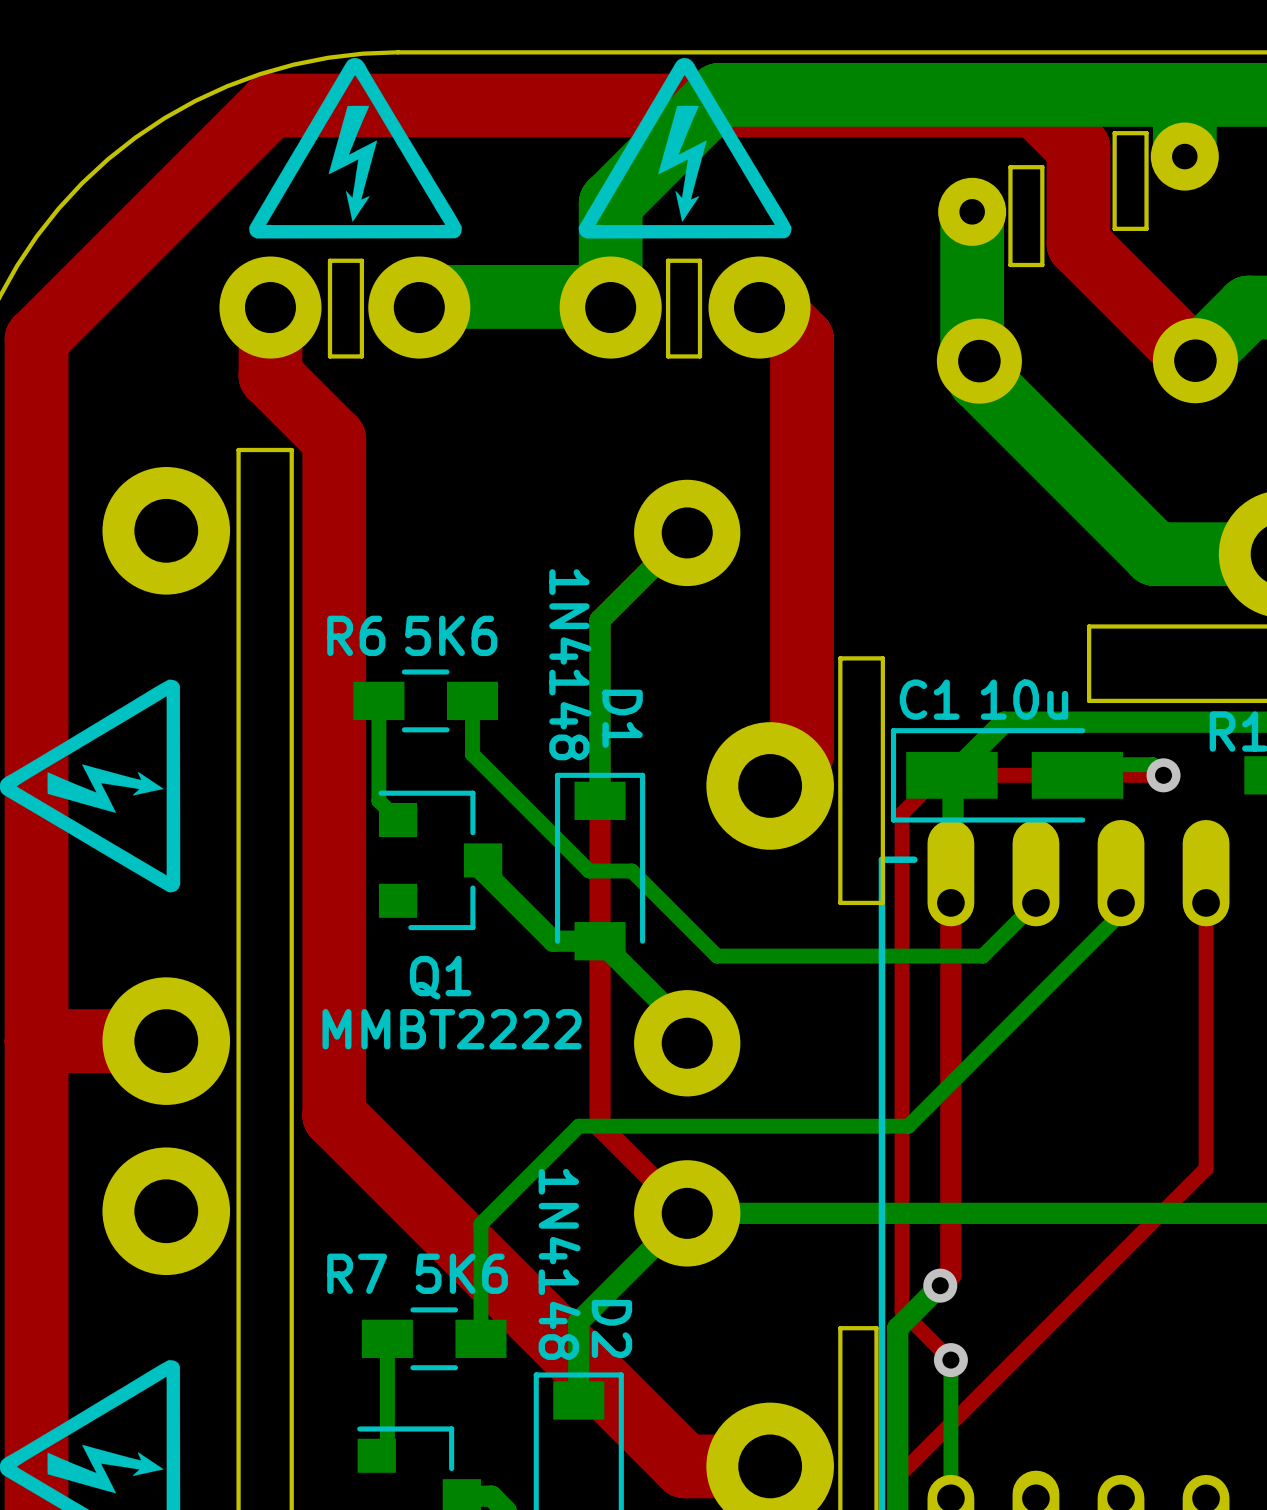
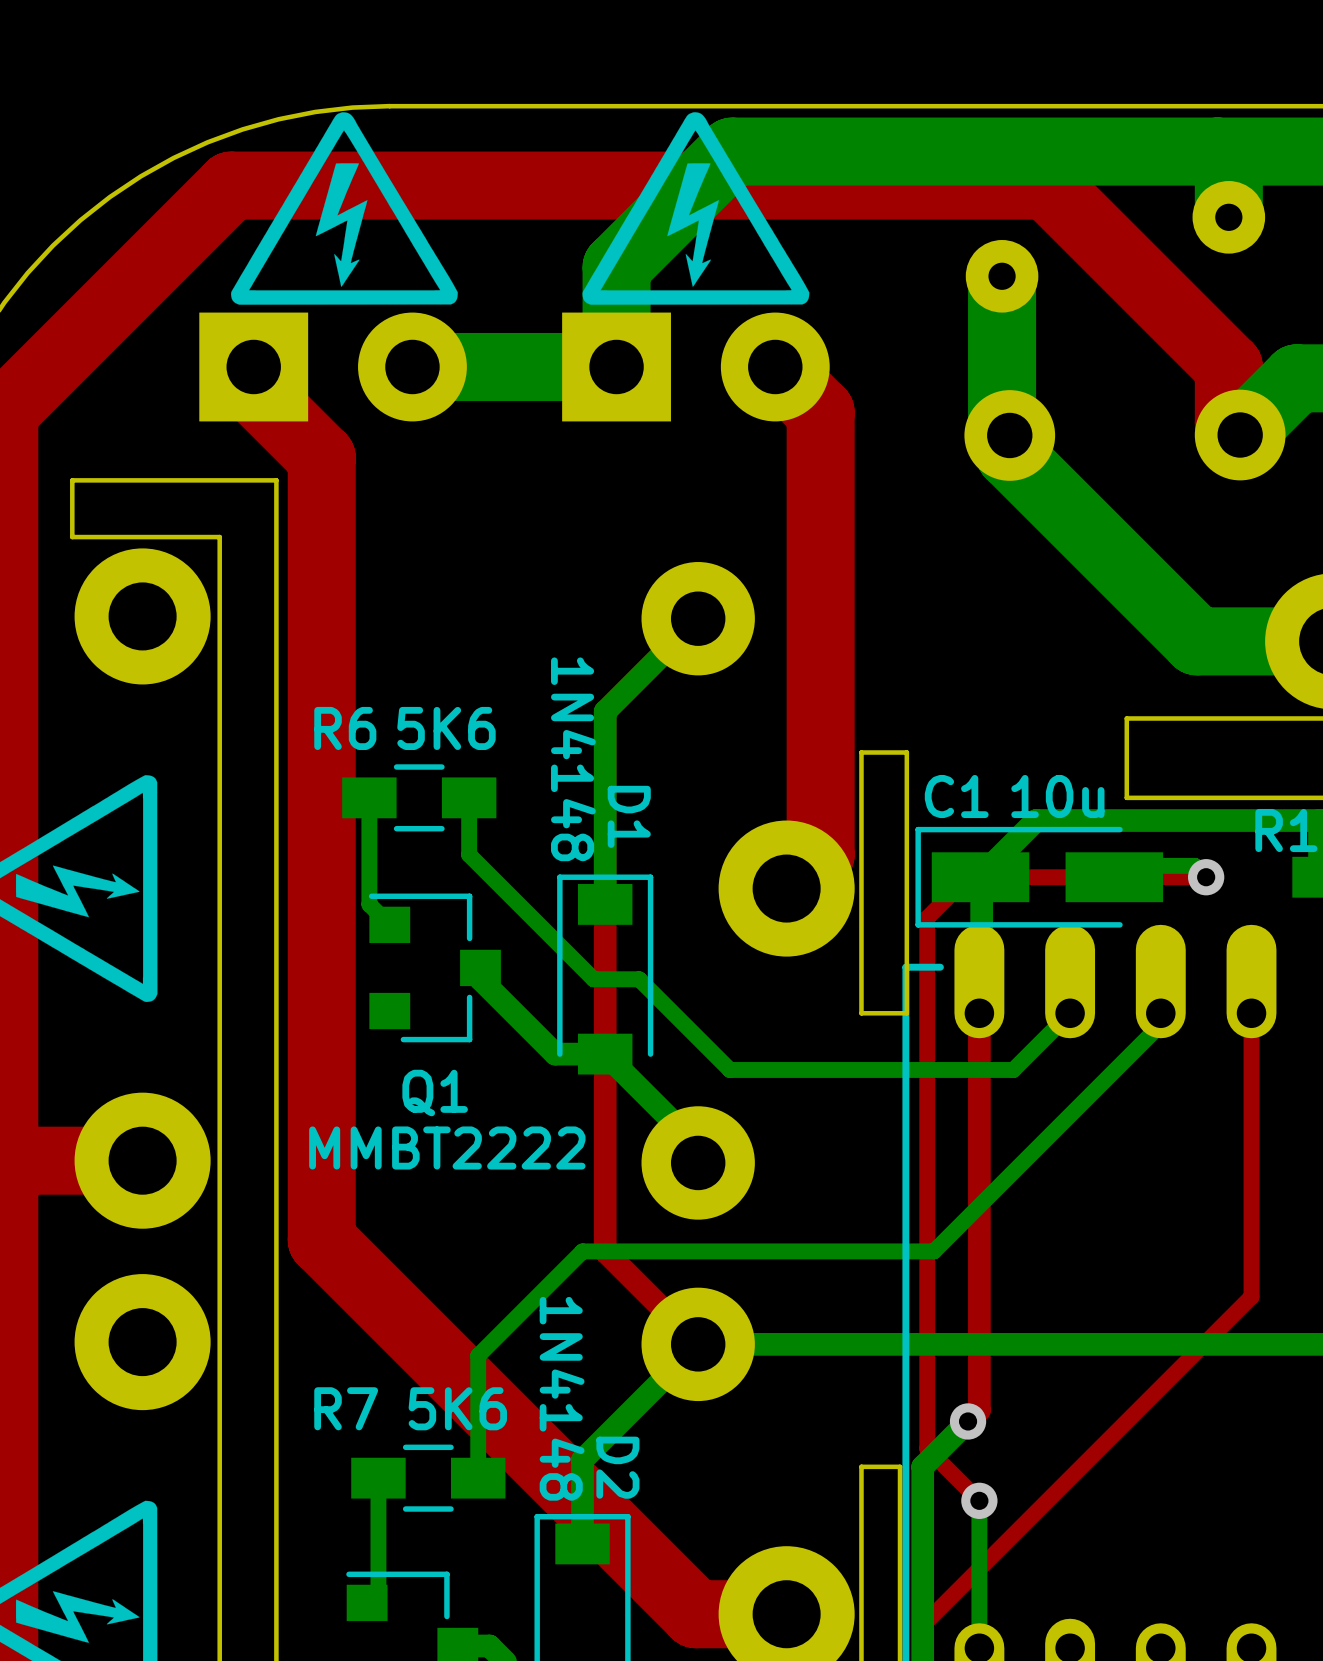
top track: (249, 126) (270, 105) (1035, 105) (1078, 148) (1078, 243) (1184, 350) -> (231, 185) (1047, 185) (1228, 366) (1228, 423)
board edge: (1146, 133) (1146, 228) (1114, 228) (1114, 133) (1146, 133) -> none
board edge: (1042, 167) (1010, 167) (1010, 265) (1042, 265) (1042, 167) -> none
part footprint: [219, 256, 471, 359] -> [199, 312, 467, 422]
part footprint: [559, 256, 811, 359] -> [562, 312, 830, 422]
board edge: (361, 260) (361, 356) (330, 356) (330, 260) (361, 260) -> none
board edge: (699, 260) (668, 260) (668, 356) (699, 356) (699, 260) -> none
top track: (270, 318) (270, 375) (334, 439) -> (253, 389) (321, 457) (321, 518)
board edge: (291, 450) (238, 450) (238, 456) -> (276, 530) (276, 480) (72, 480) (72, 537) (219, 537)

